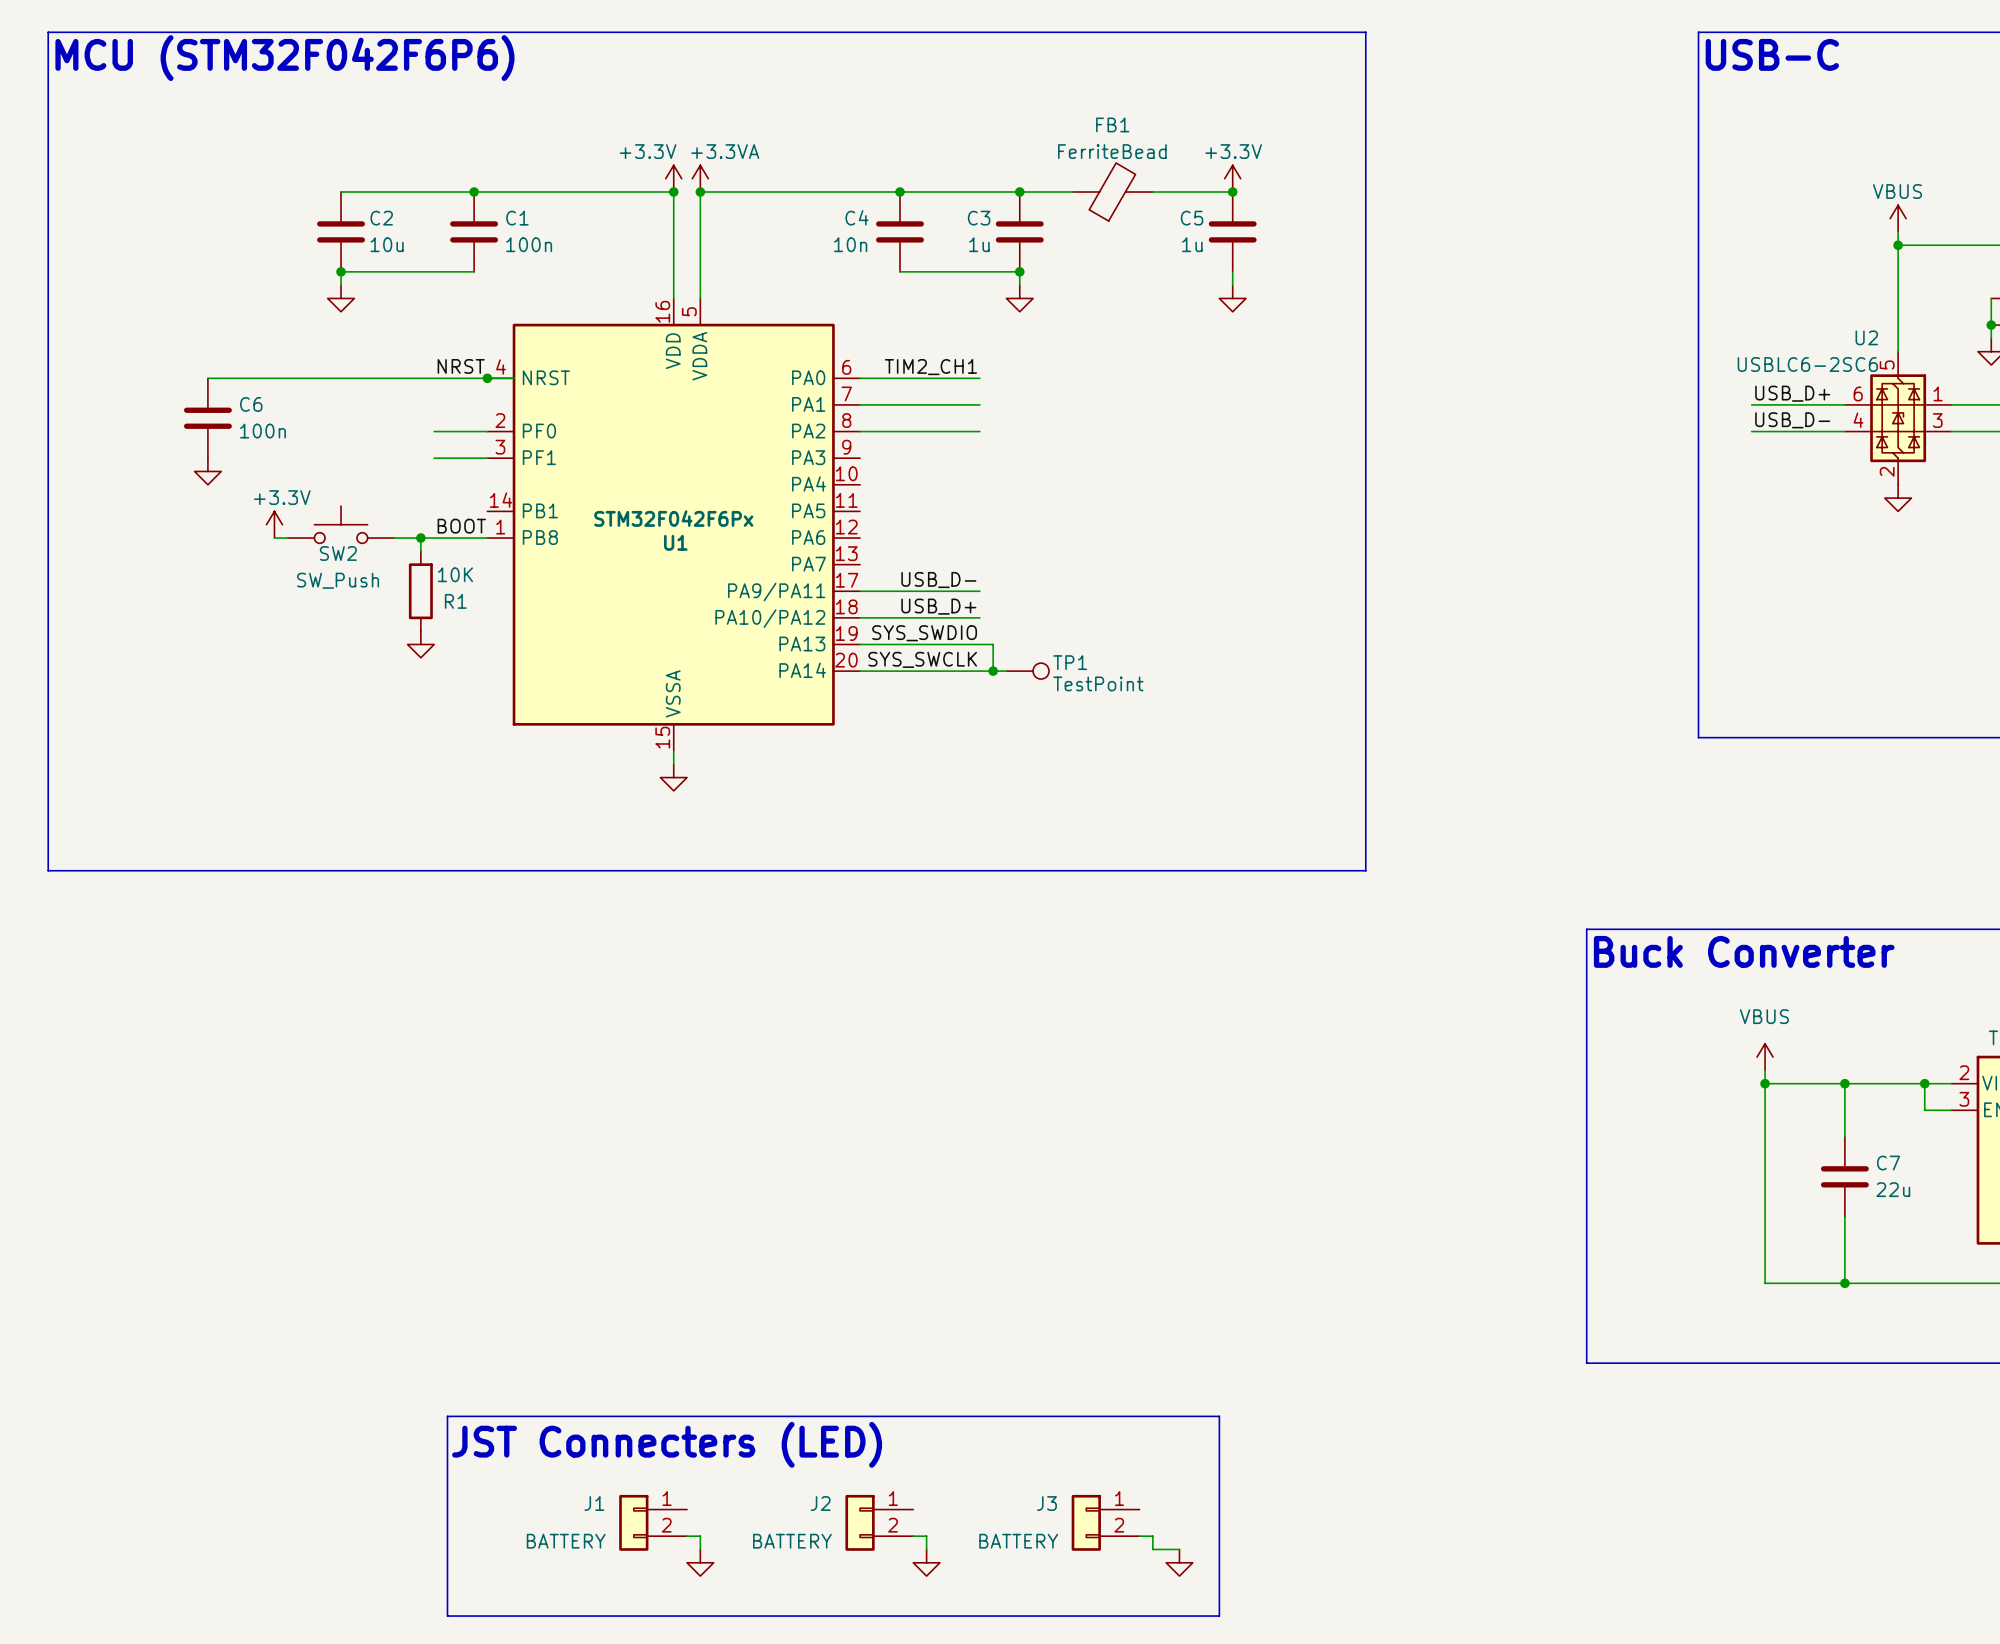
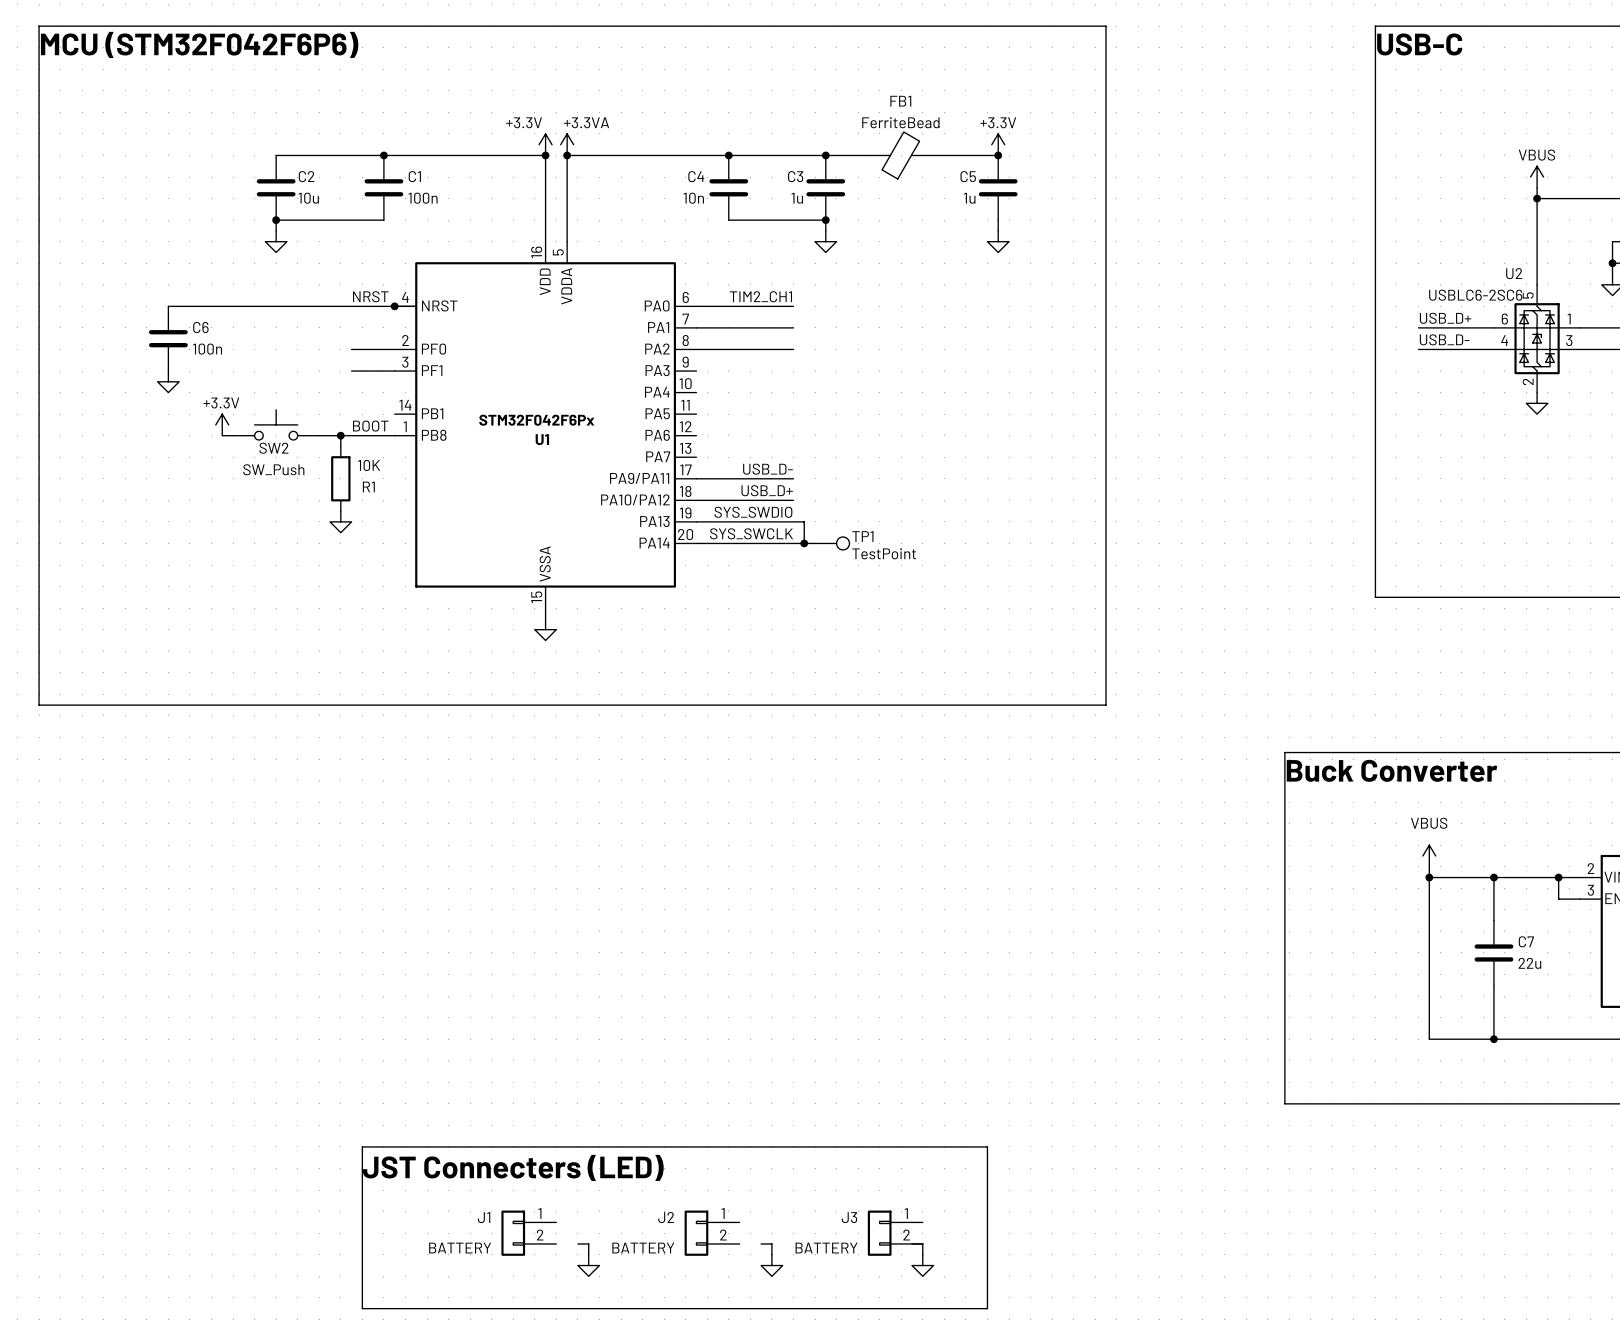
wire: (687, 1536) (700, 1536) (700, 1549) -> (577, 1243) (588, 1243) (588, 1254)
wire: (913, 1536) (926, 1536) (926, 1549) -> (761, 1243) (771, 1243) (771, 1254)
wire: none -> (912, 1243) (922, 1243) (922, 1254)
wire: (1139, 1536) (1152, 1536) (1152, 1549) (1179, 1549) -> none
power symbol position: (700, 1562) -> (588, 1265)
power symbol position: (926, 1562) -> (771, 1265)
power symbol position: (1179, 1562) -> (922, 1265)

